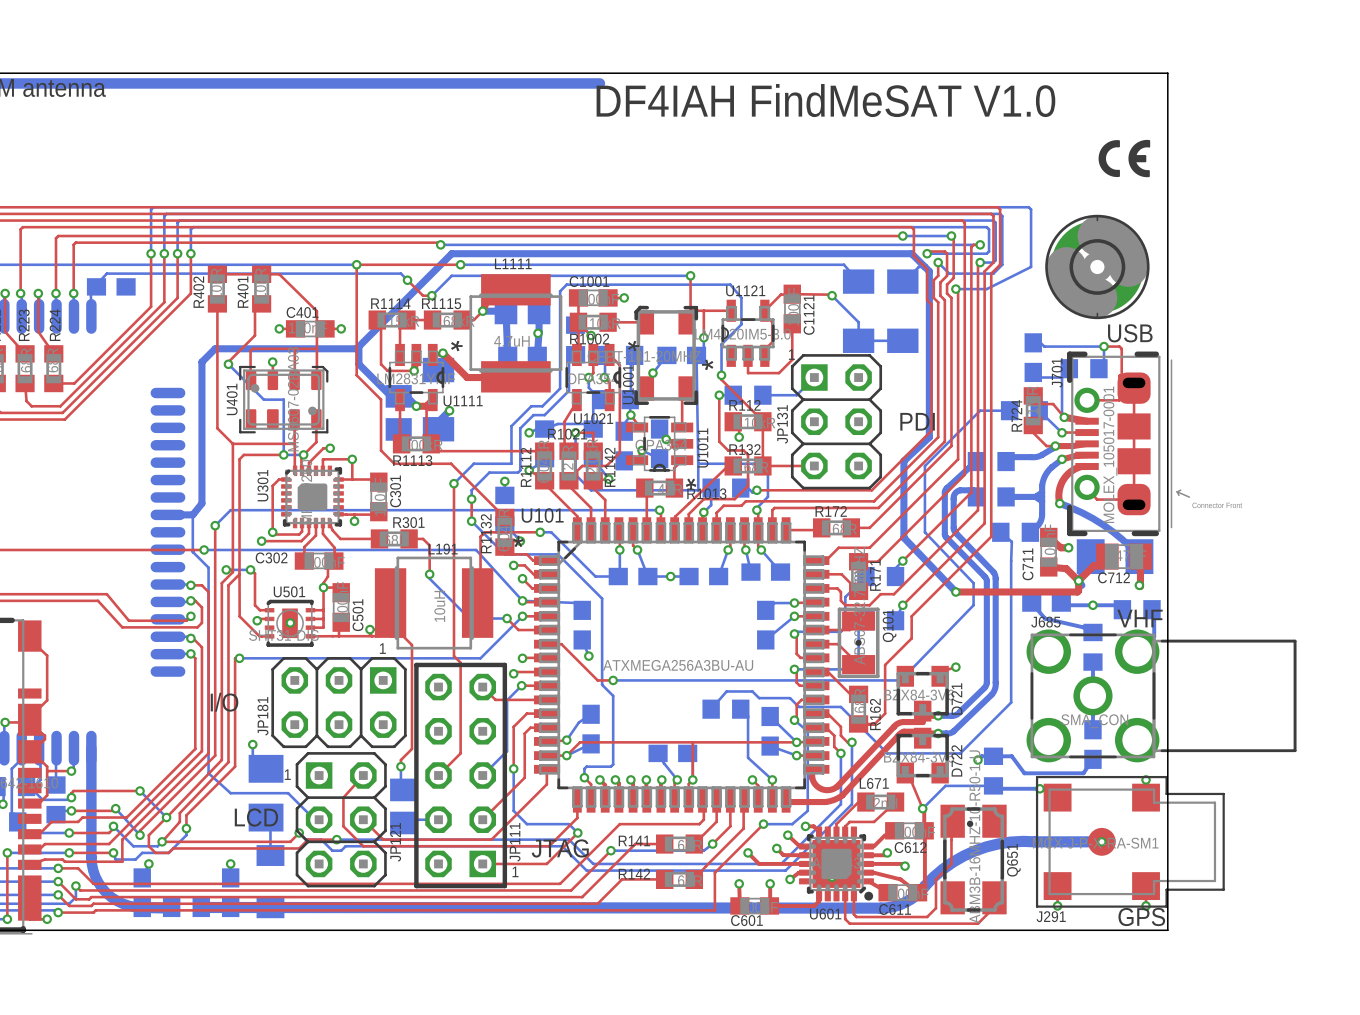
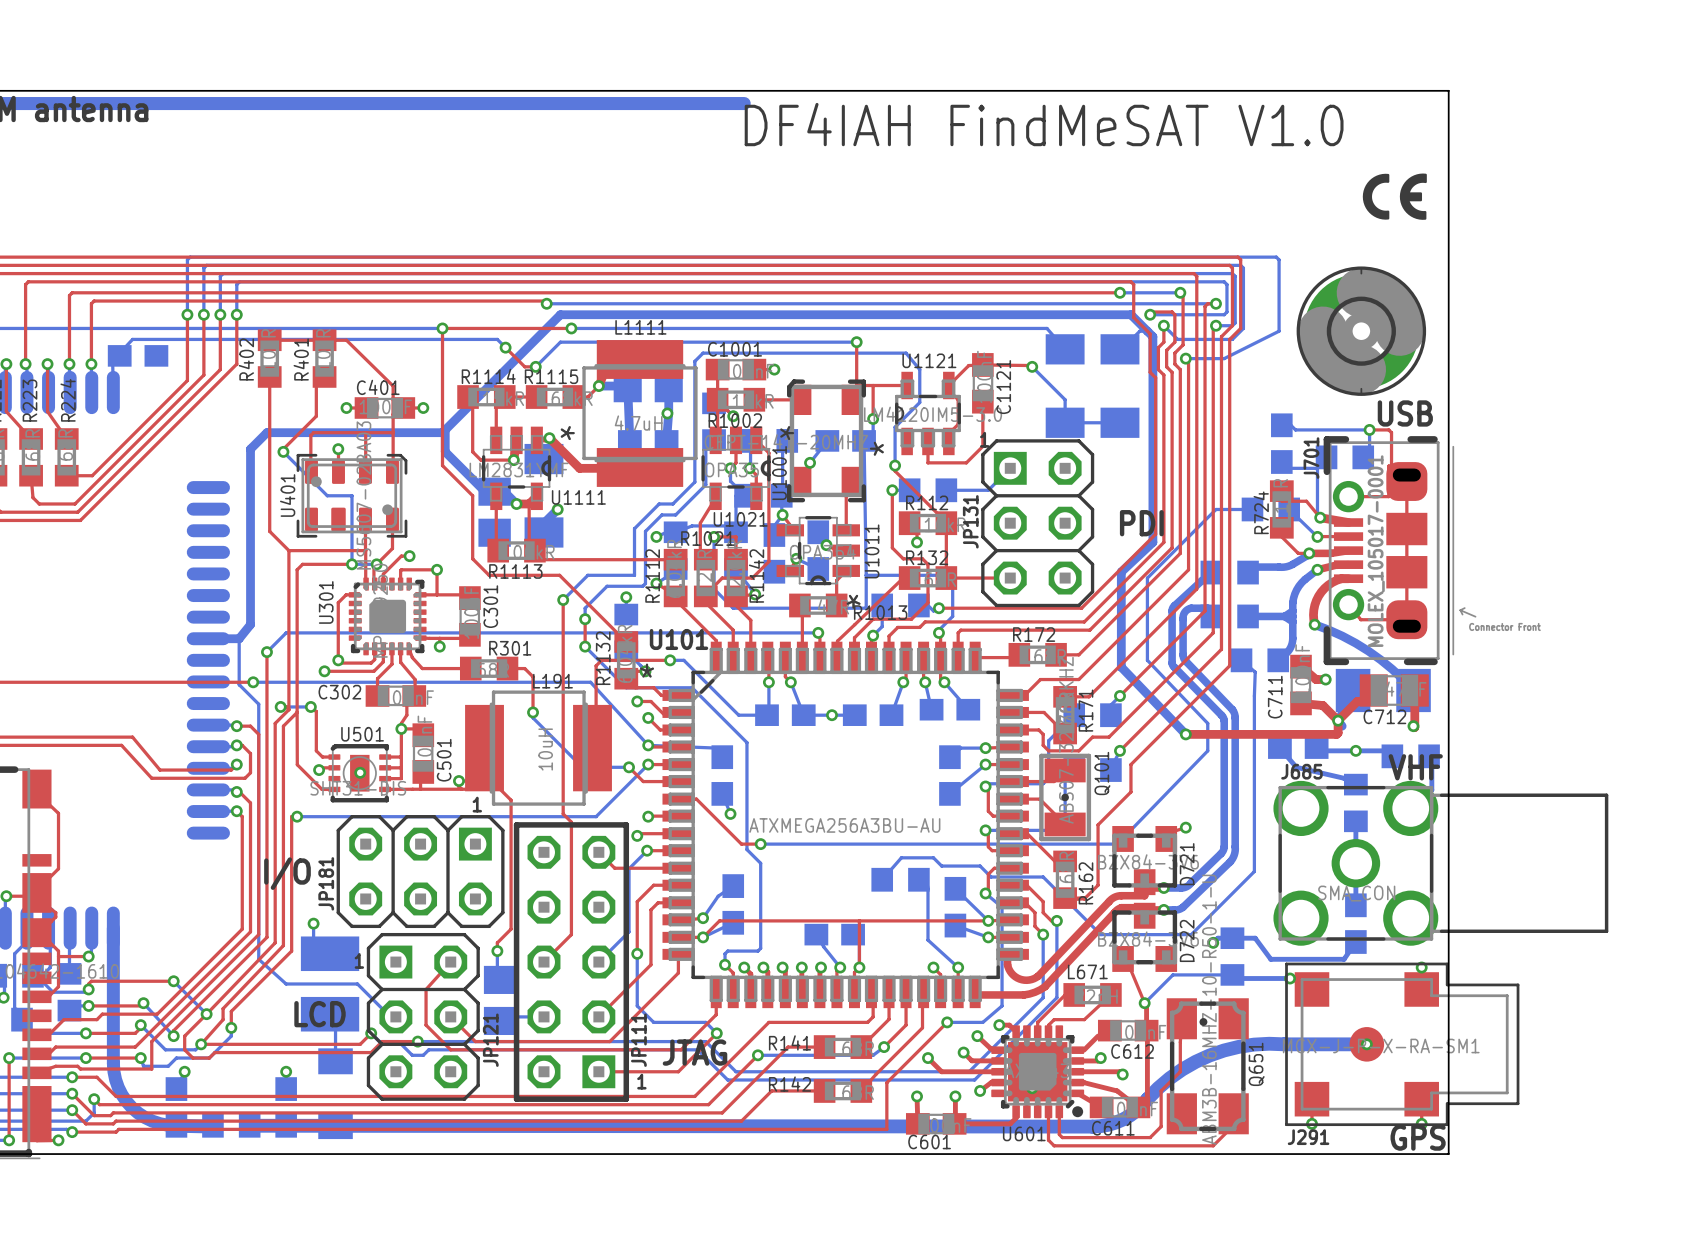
part footprint: [248, 754, 284, 832] -> [300, 936, 360, 1032]

